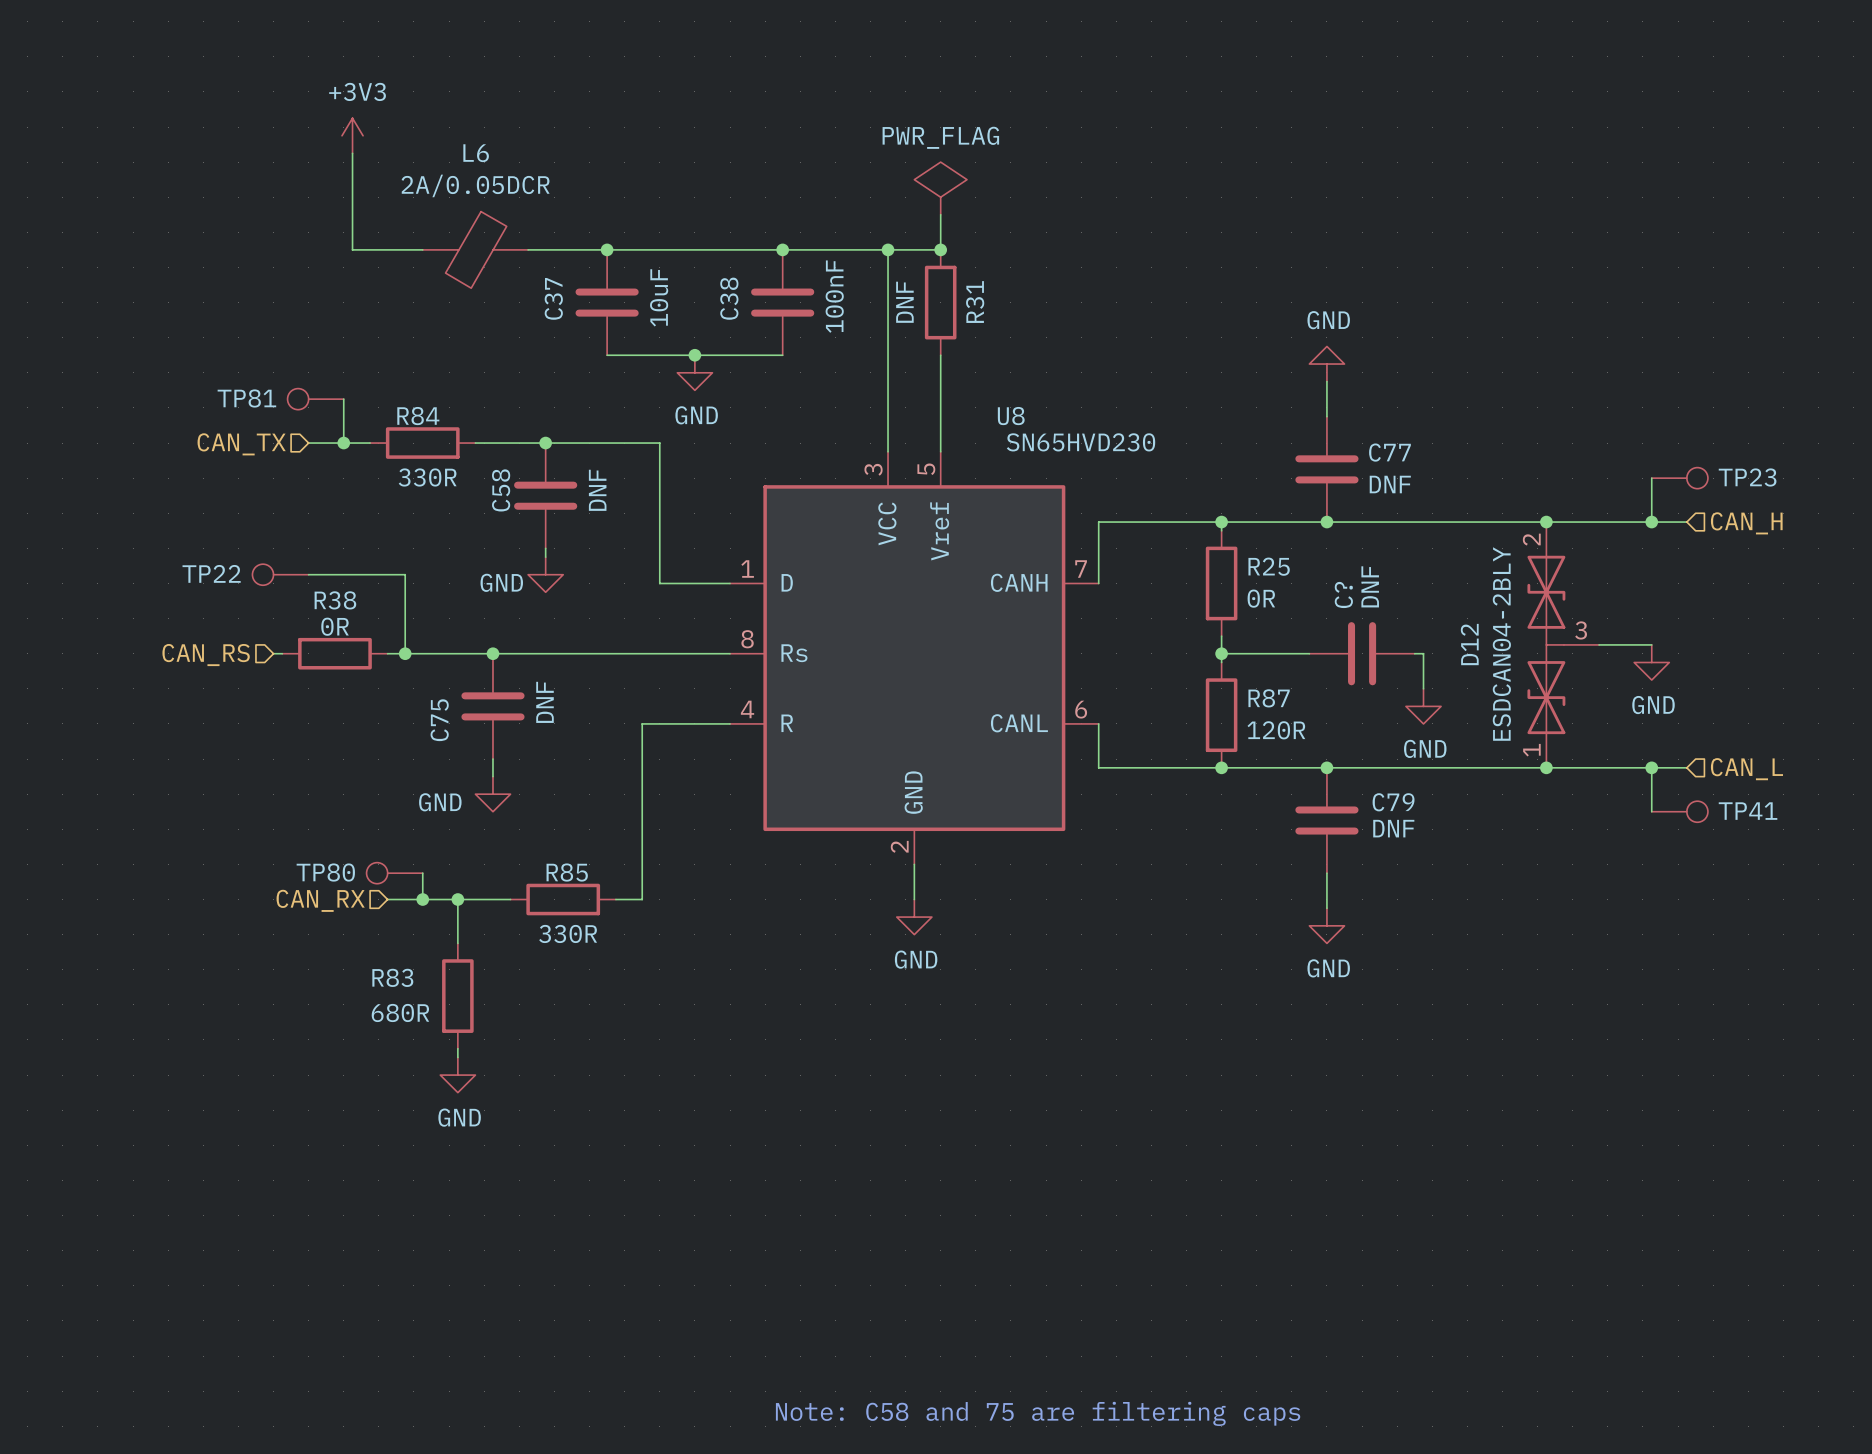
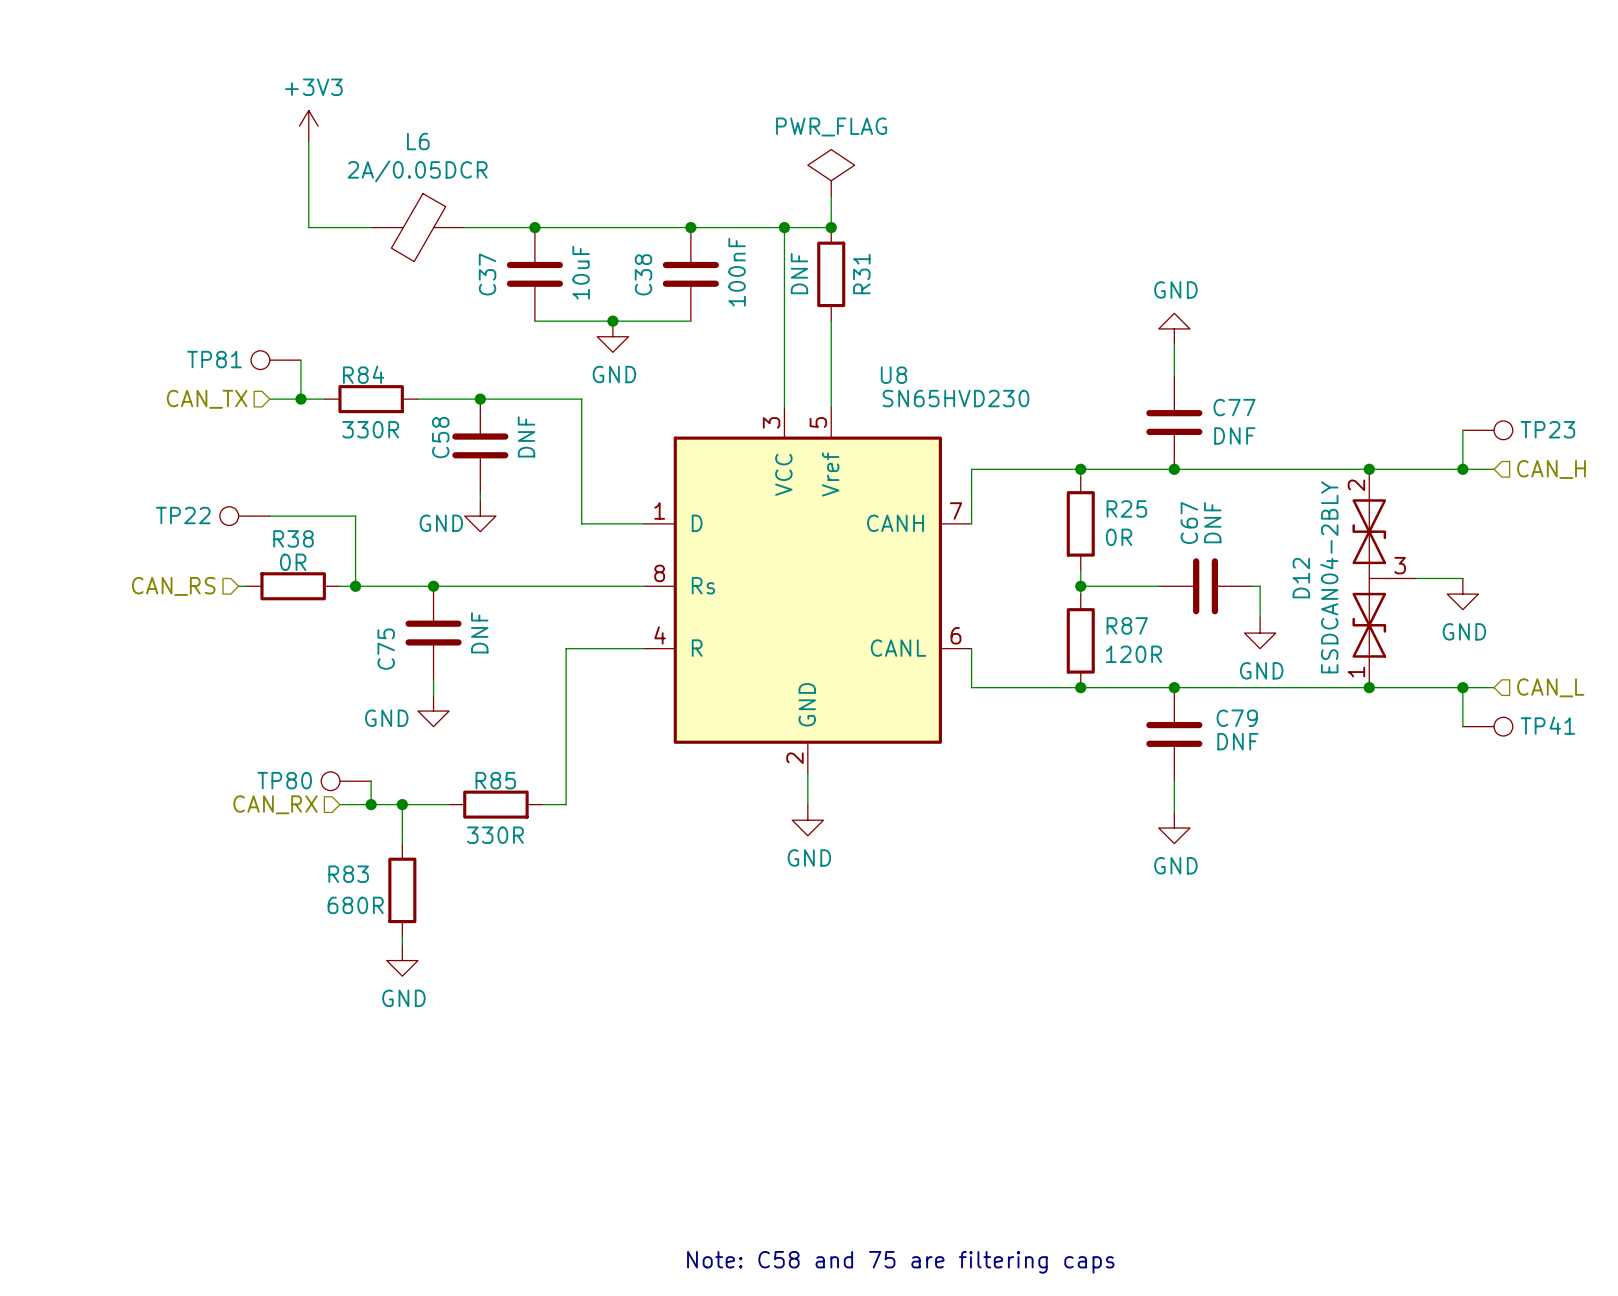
C? name: C? (1343, 594) -> C67 (1189, 523)

